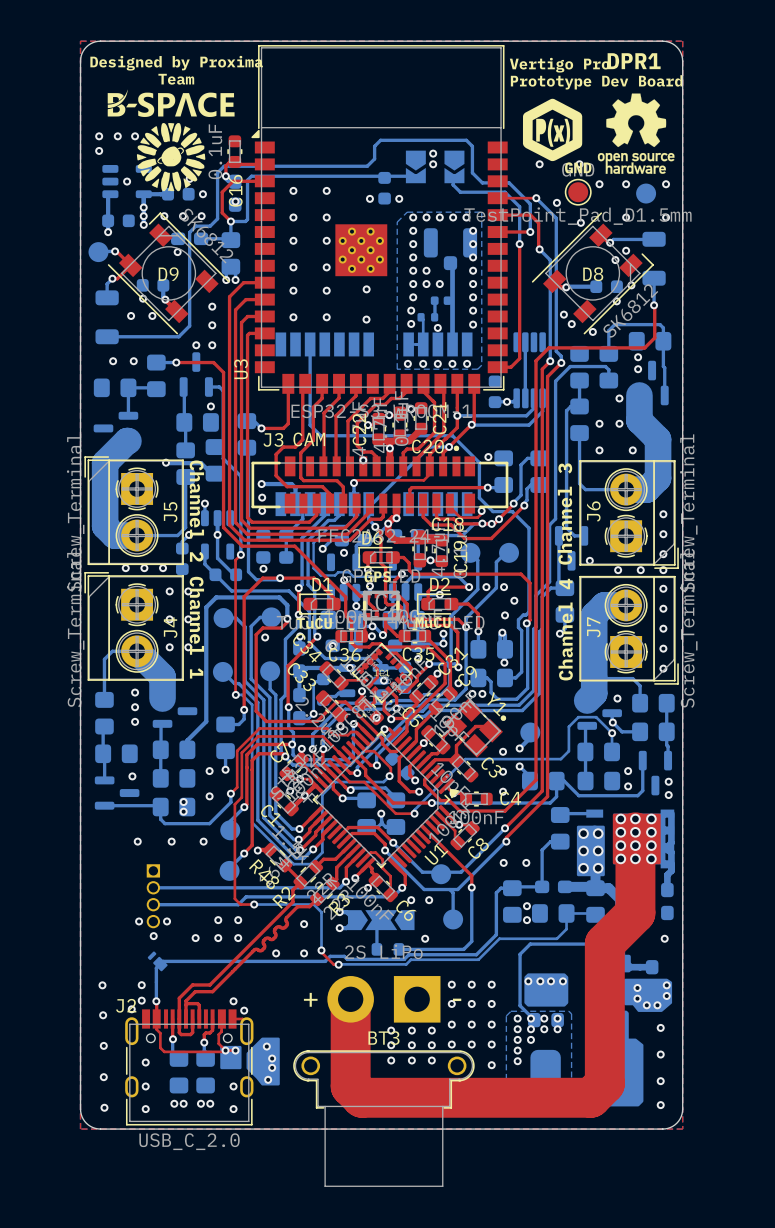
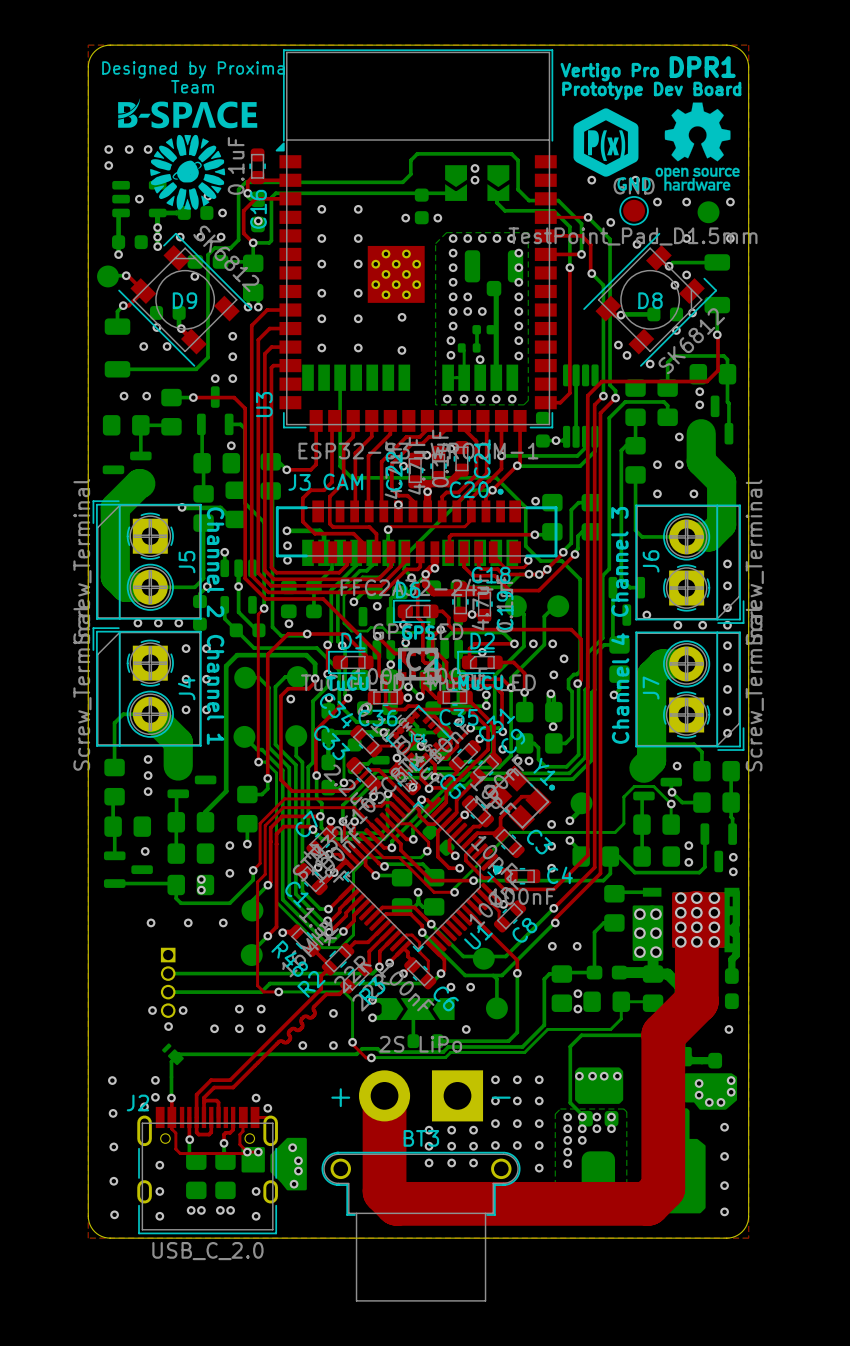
via: none -> (342, 645)

